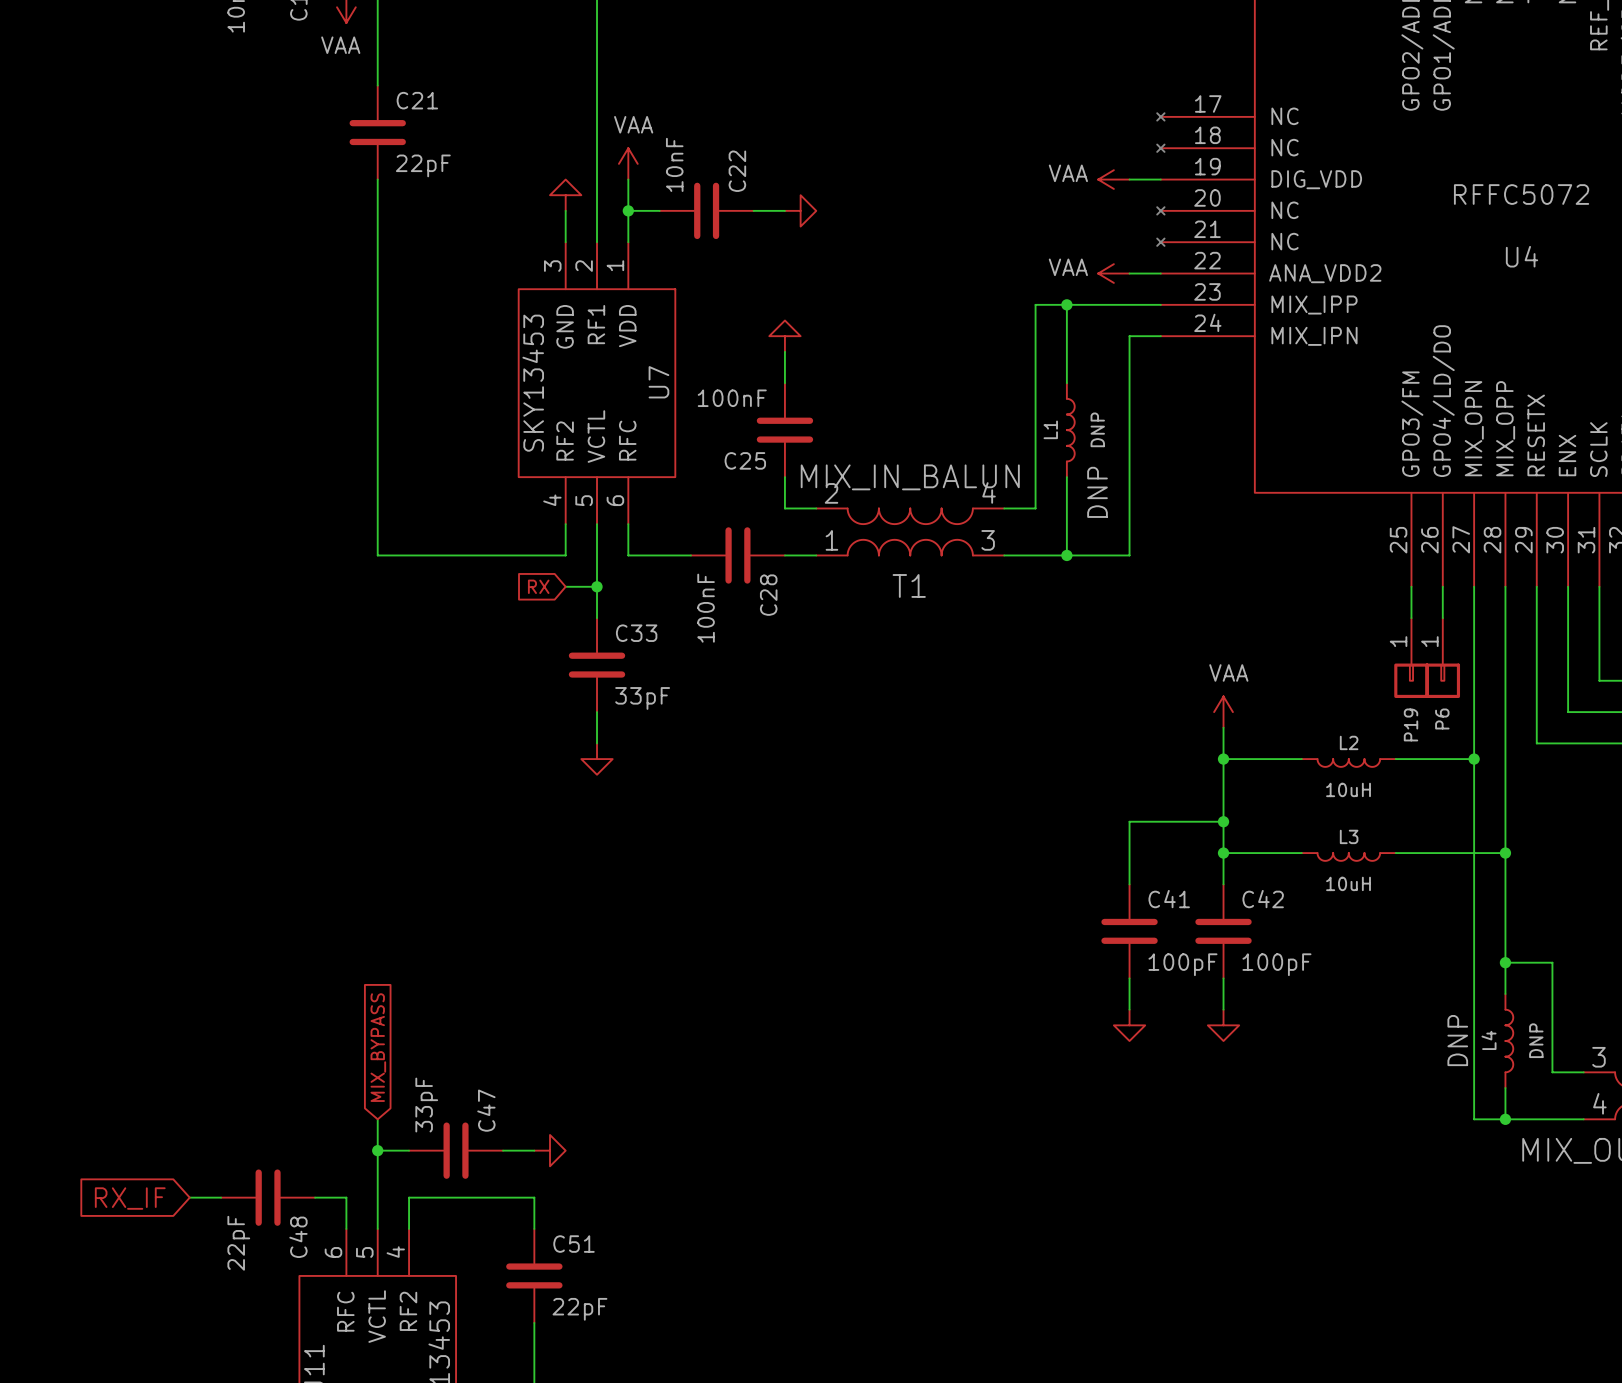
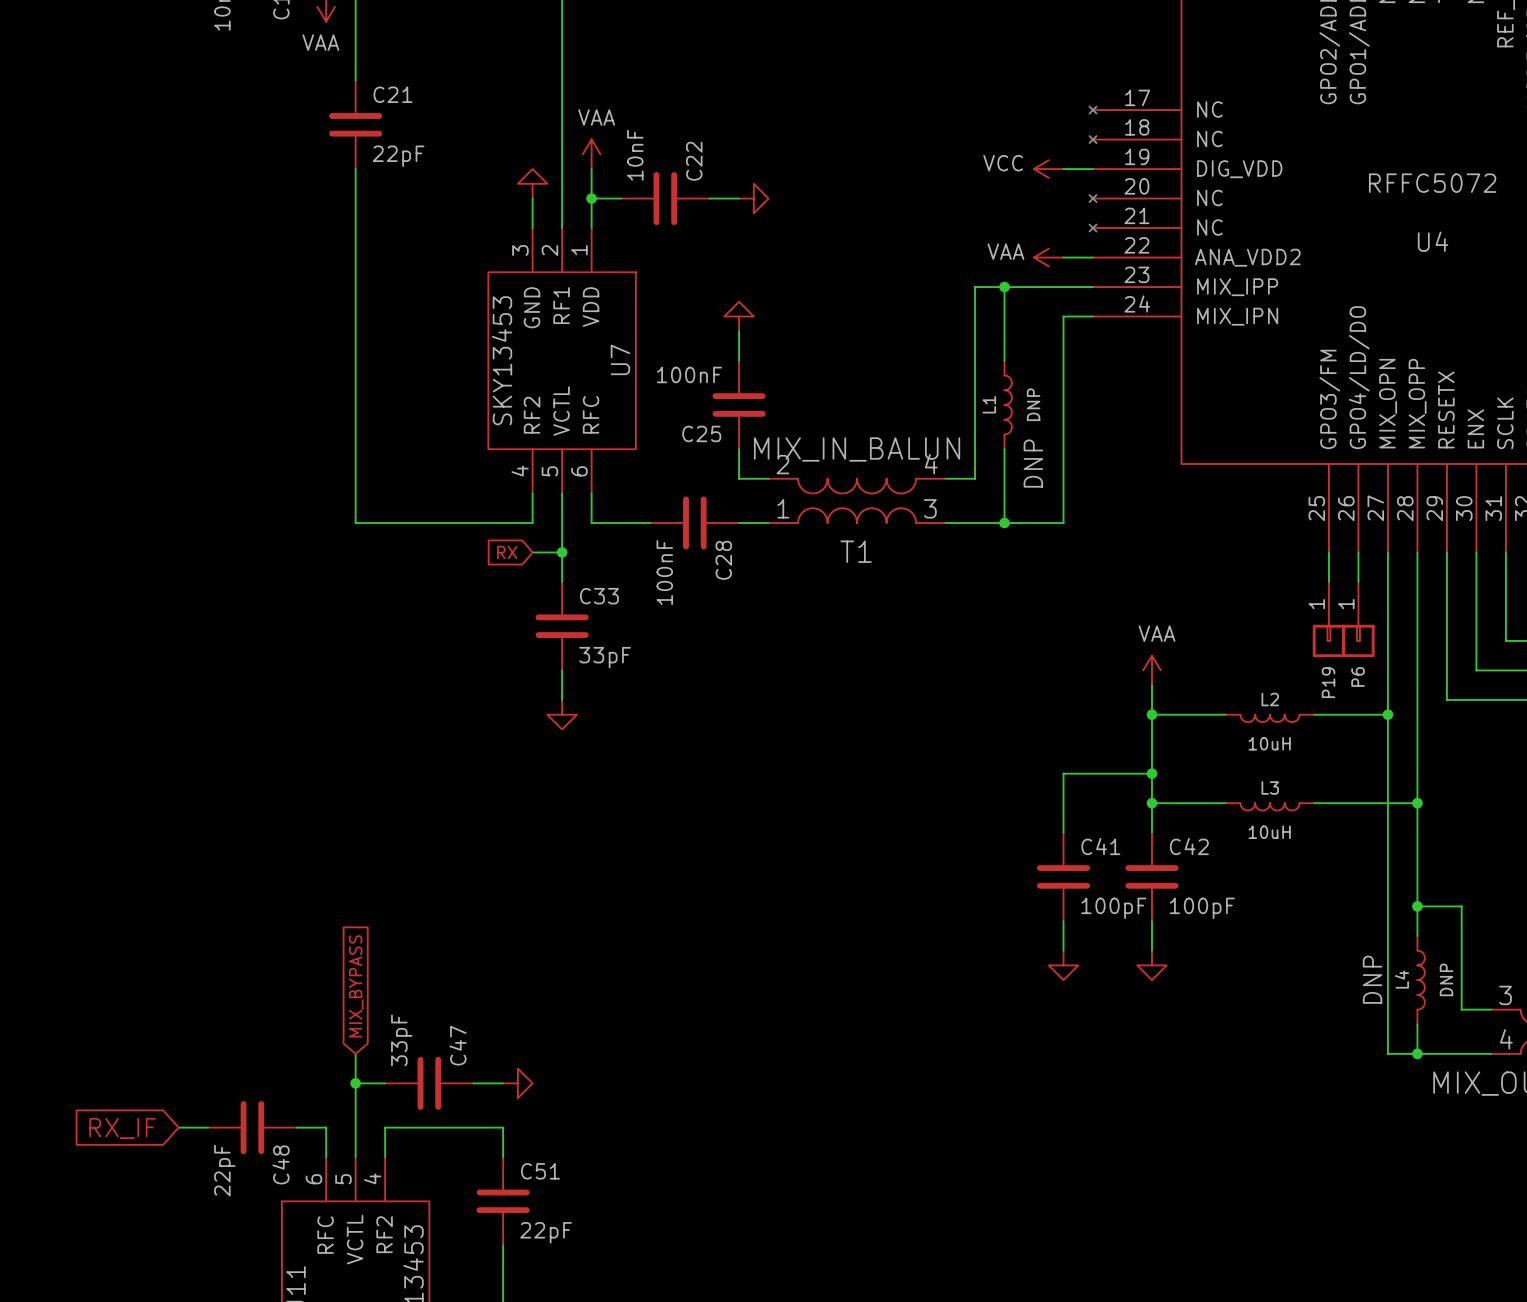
power symbol: VAA (1113, 179) -> VCC (1048, 169)

